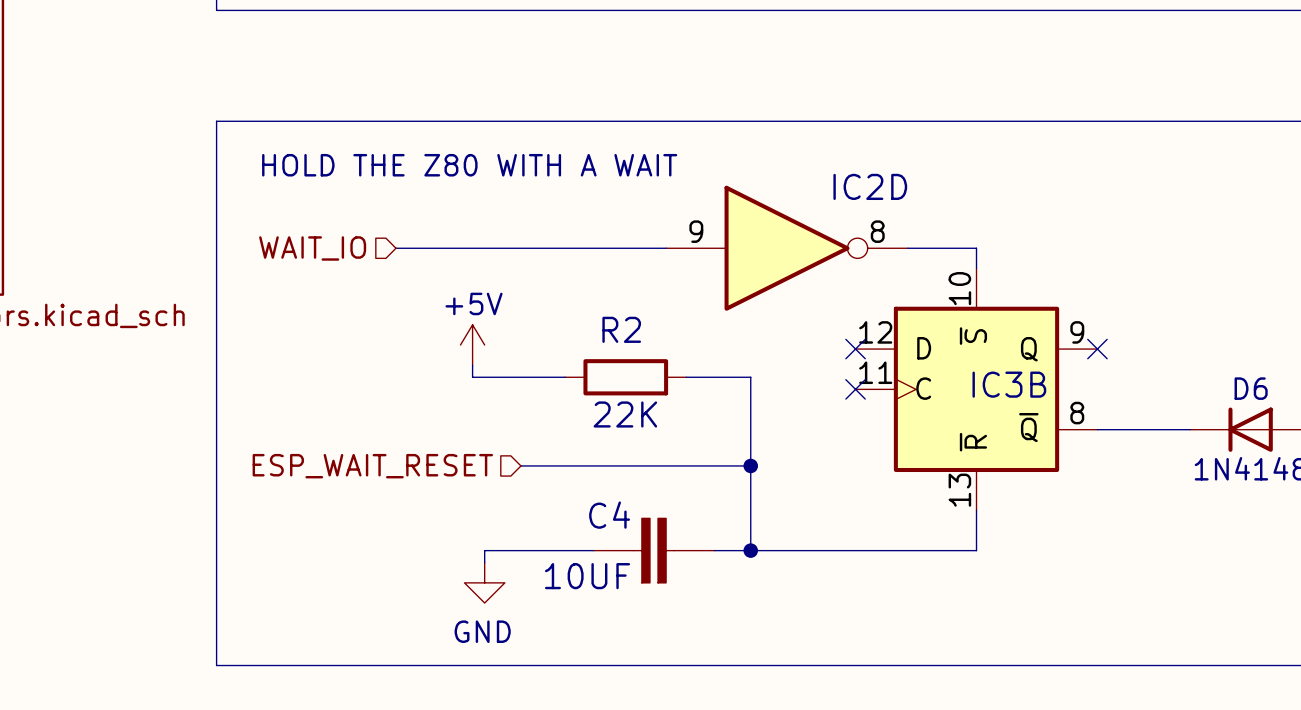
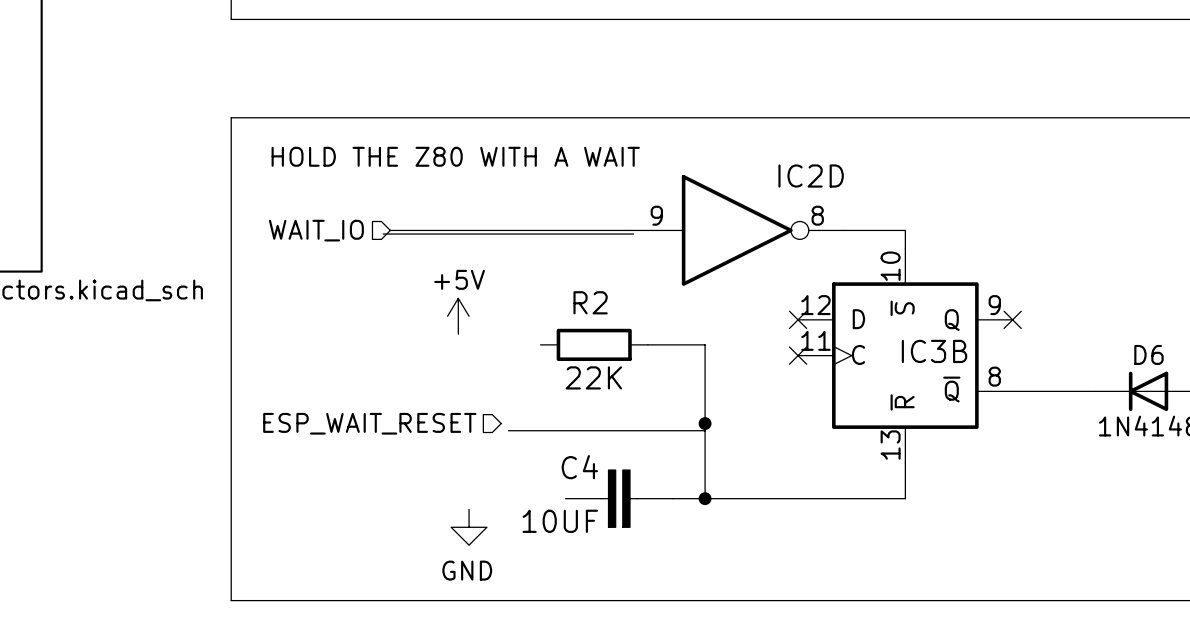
wire: none -> (383, 234) (633, 234)
wire: (472, 365) (472, 377) (565, 377) -> none
wire: (520, 465) (750, 465) -> none
wire: none -> (508, 430) (705, 430)
wire: (593, 550) (484, 550) (484, 562) -> none

